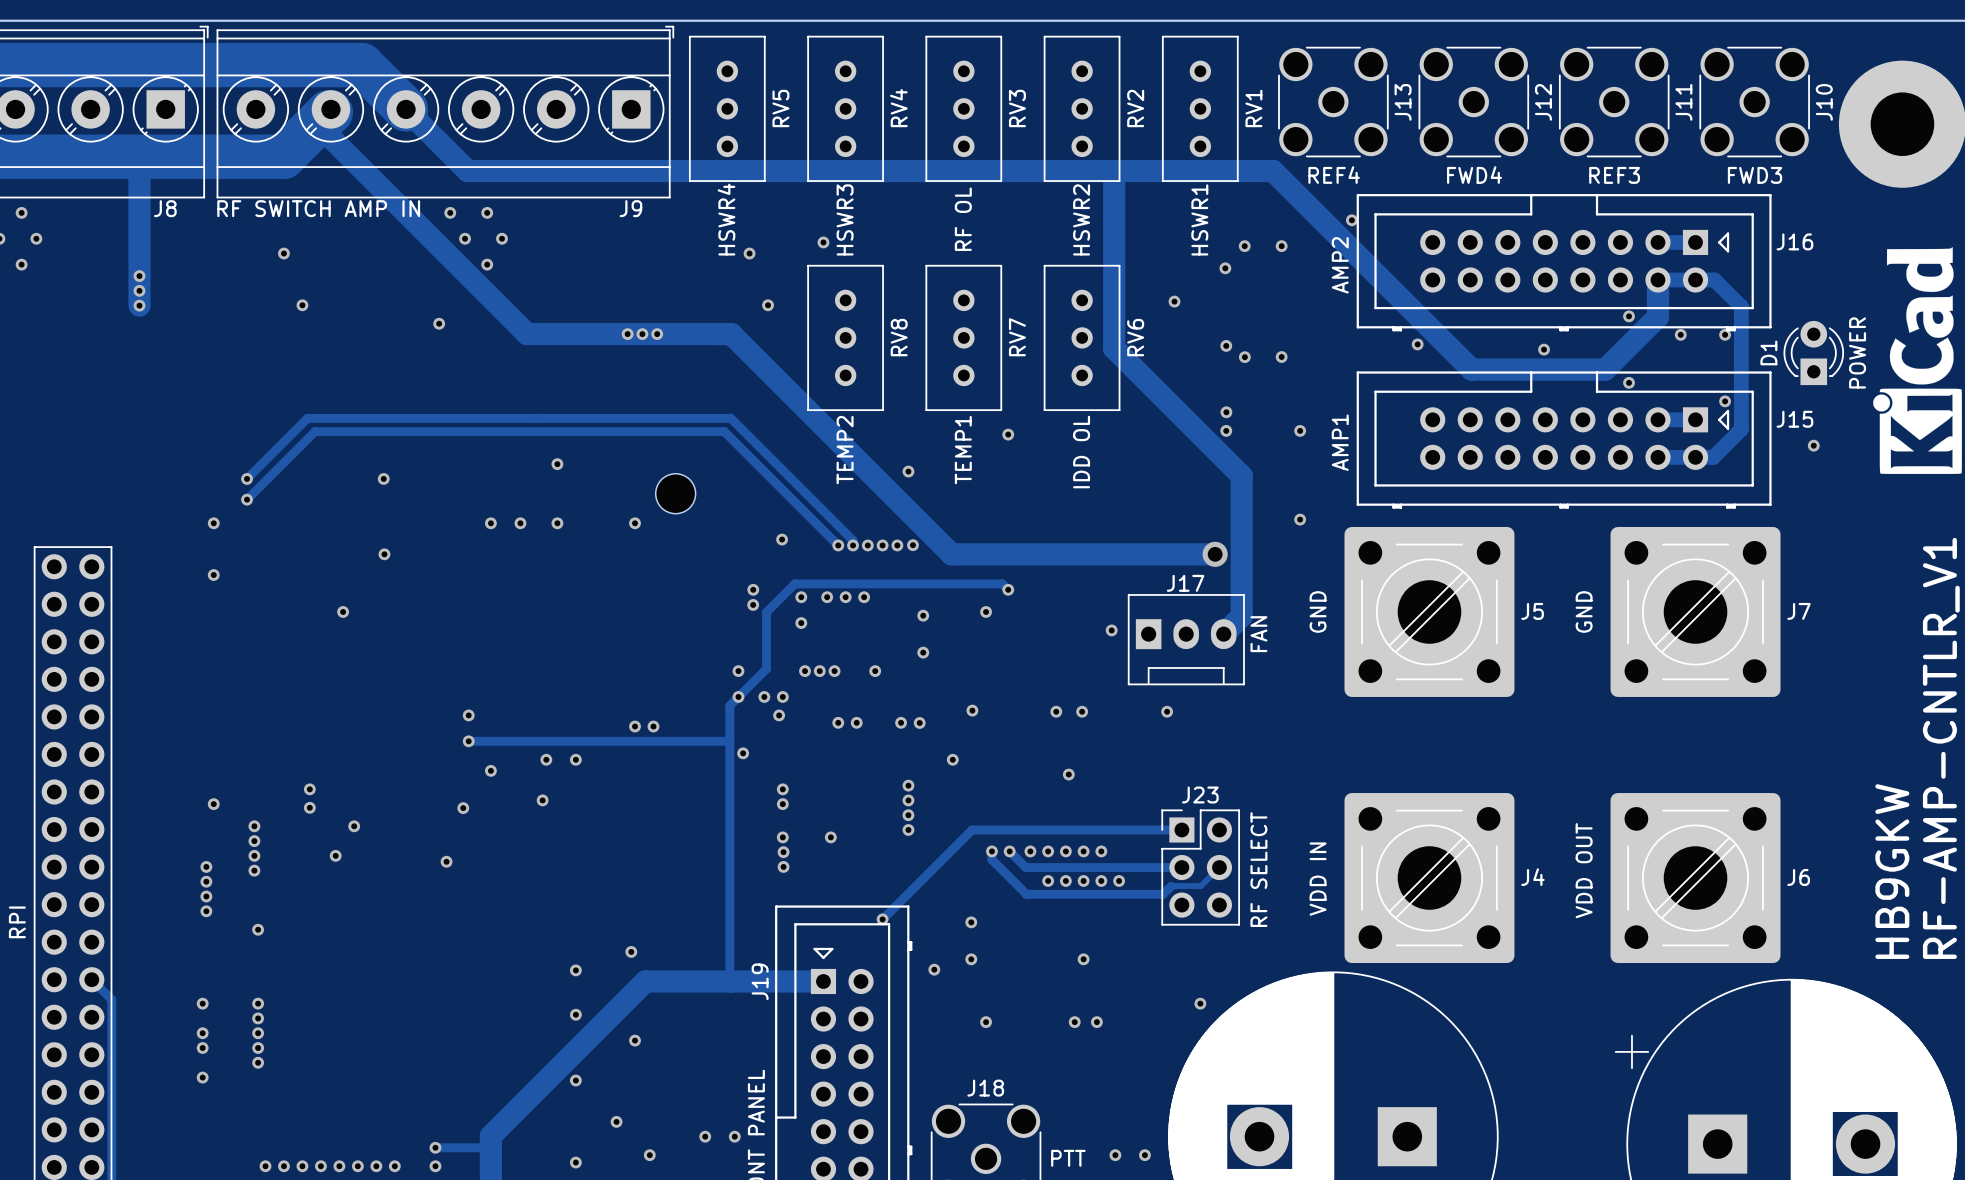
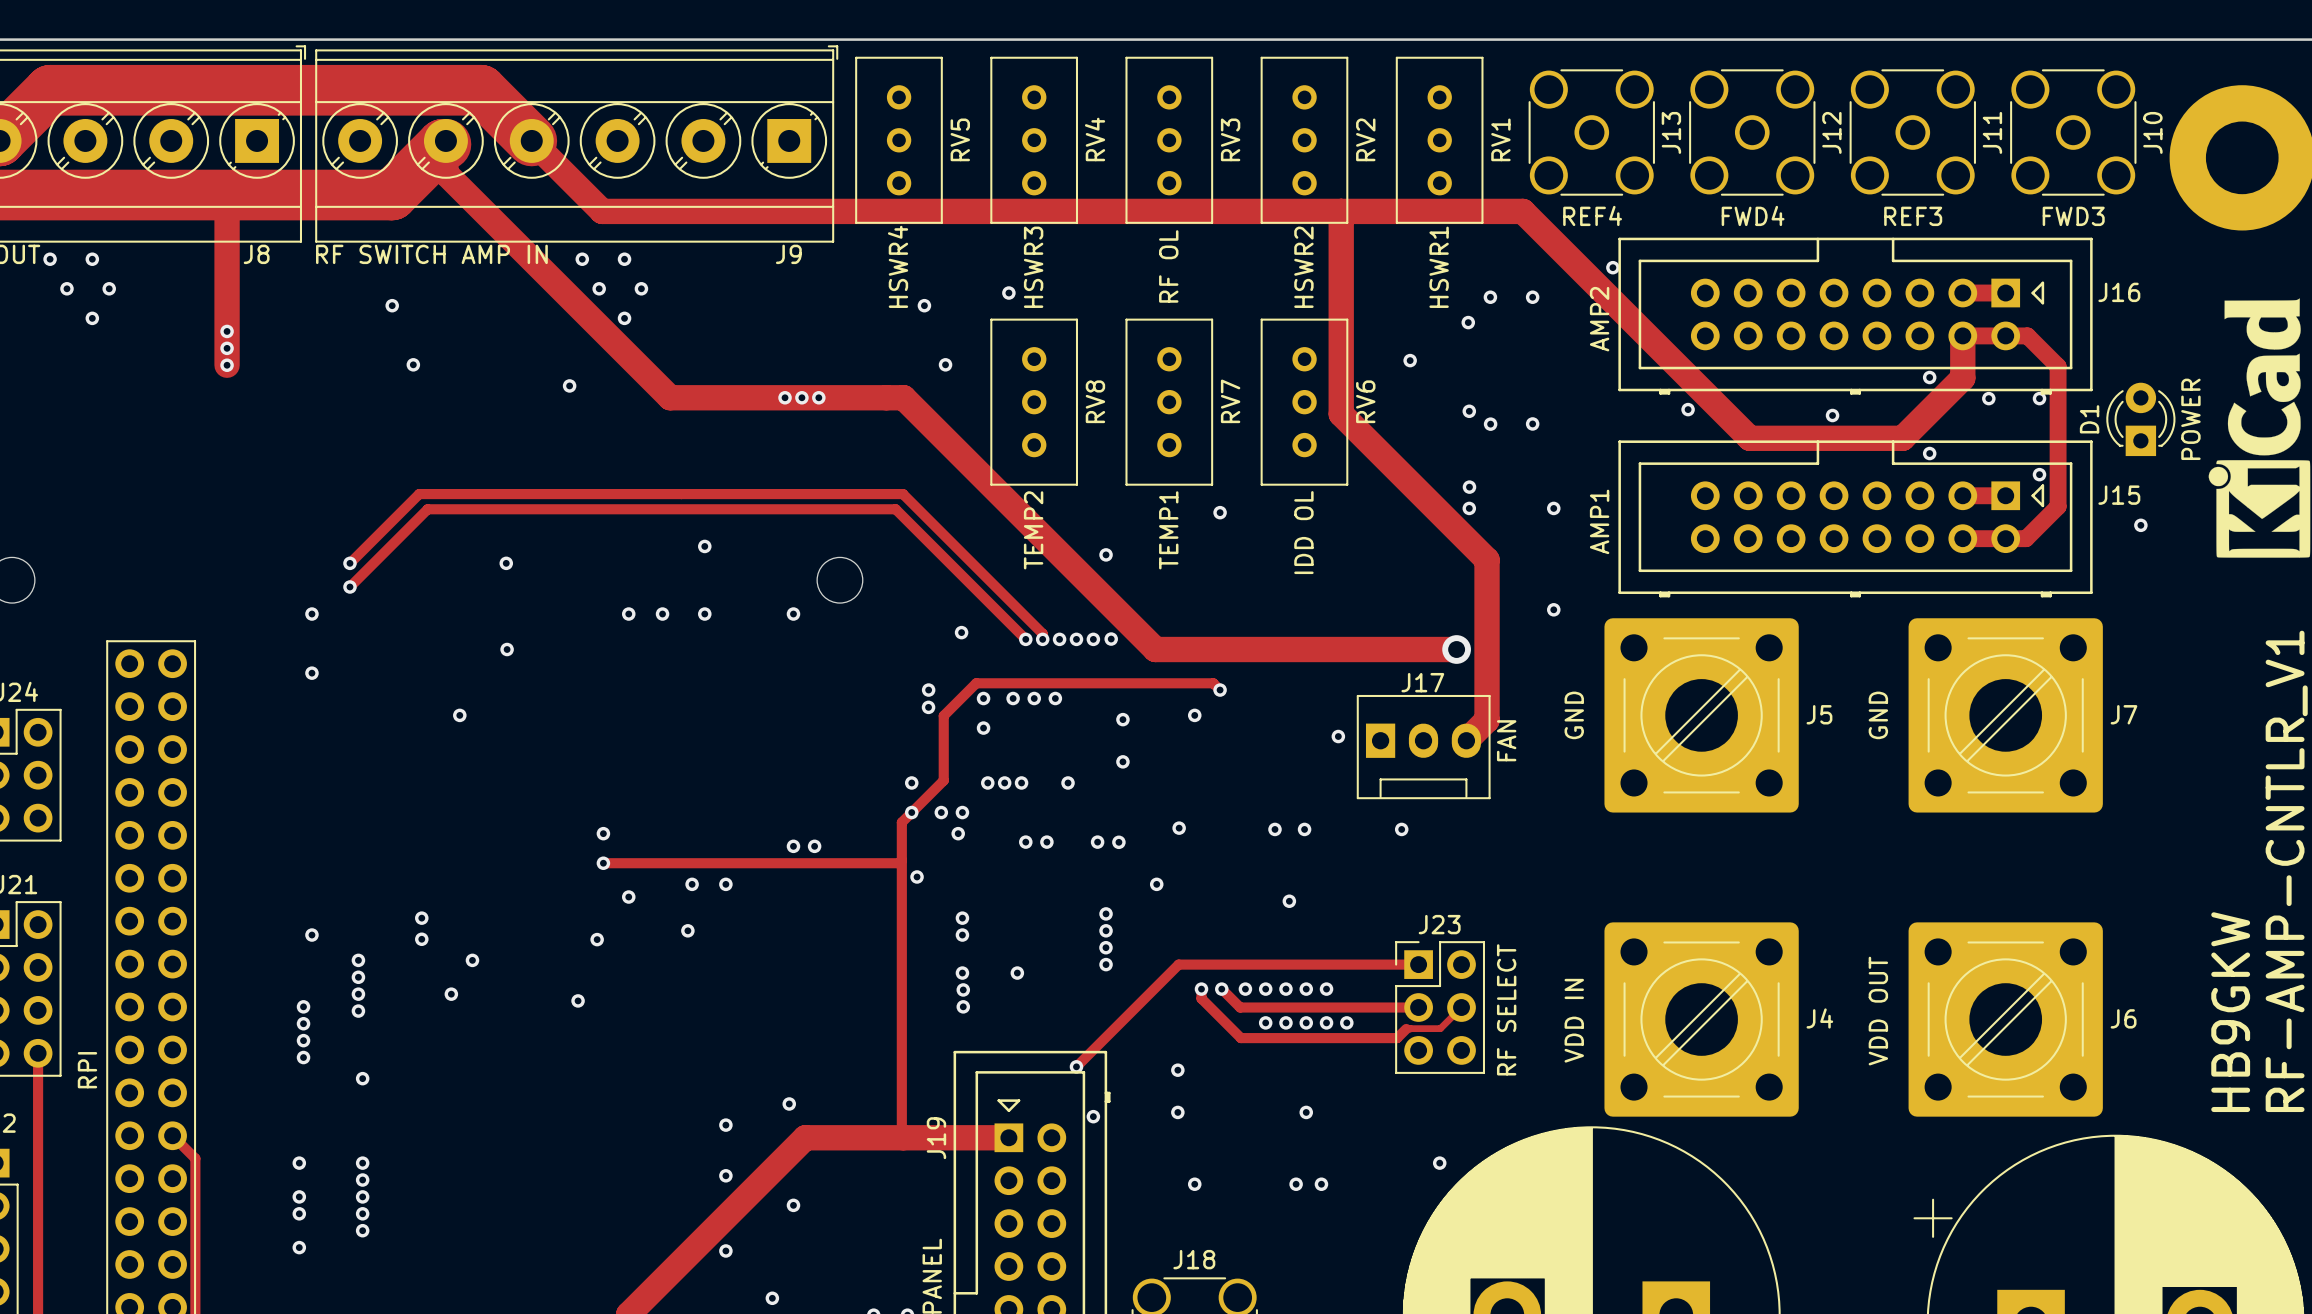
via position: (934, 969) -> (1093, 1116)

